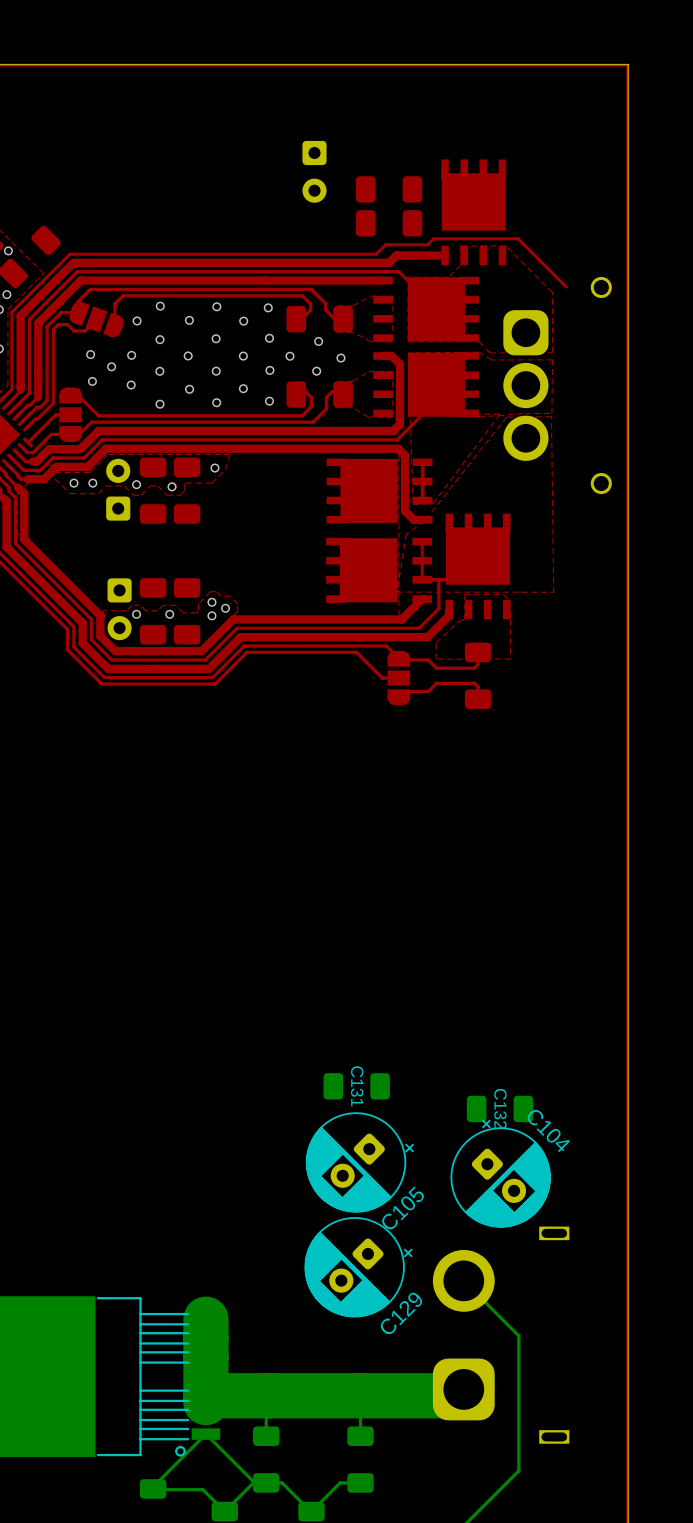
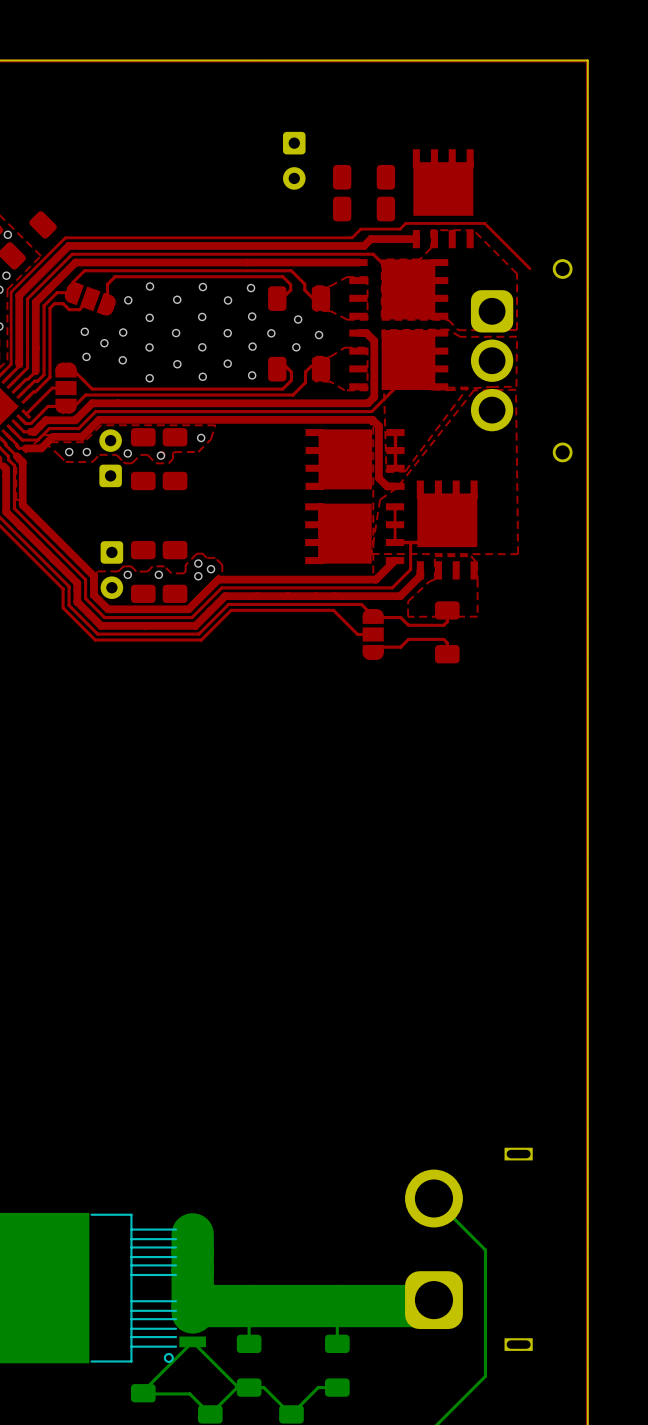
C131: (356, 1086) -> none
C132: (499, 1108) -> none
C105: (359, 1162) -> none
C104: (500, 1173) -> none
C129: (358, 1267) -> none

